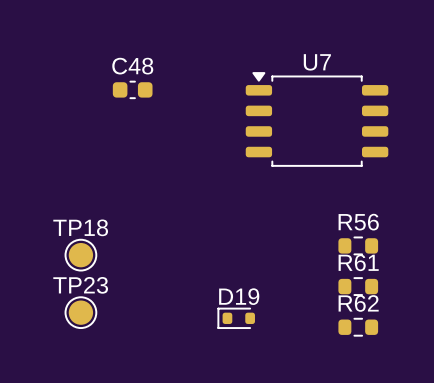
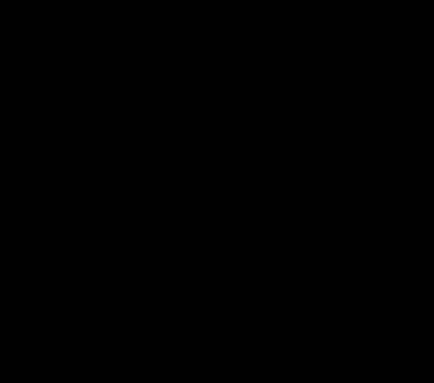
C48: (132, 89) -> none
U7: (317, 119) -> none
R56: (358, 245) -> none
TP18: (80, 255) -> none
R61: (358, 286) -> none
TP23: (80, 312) -> none
D19: (236, 318) -> none
R62: (358, 327) -> none

